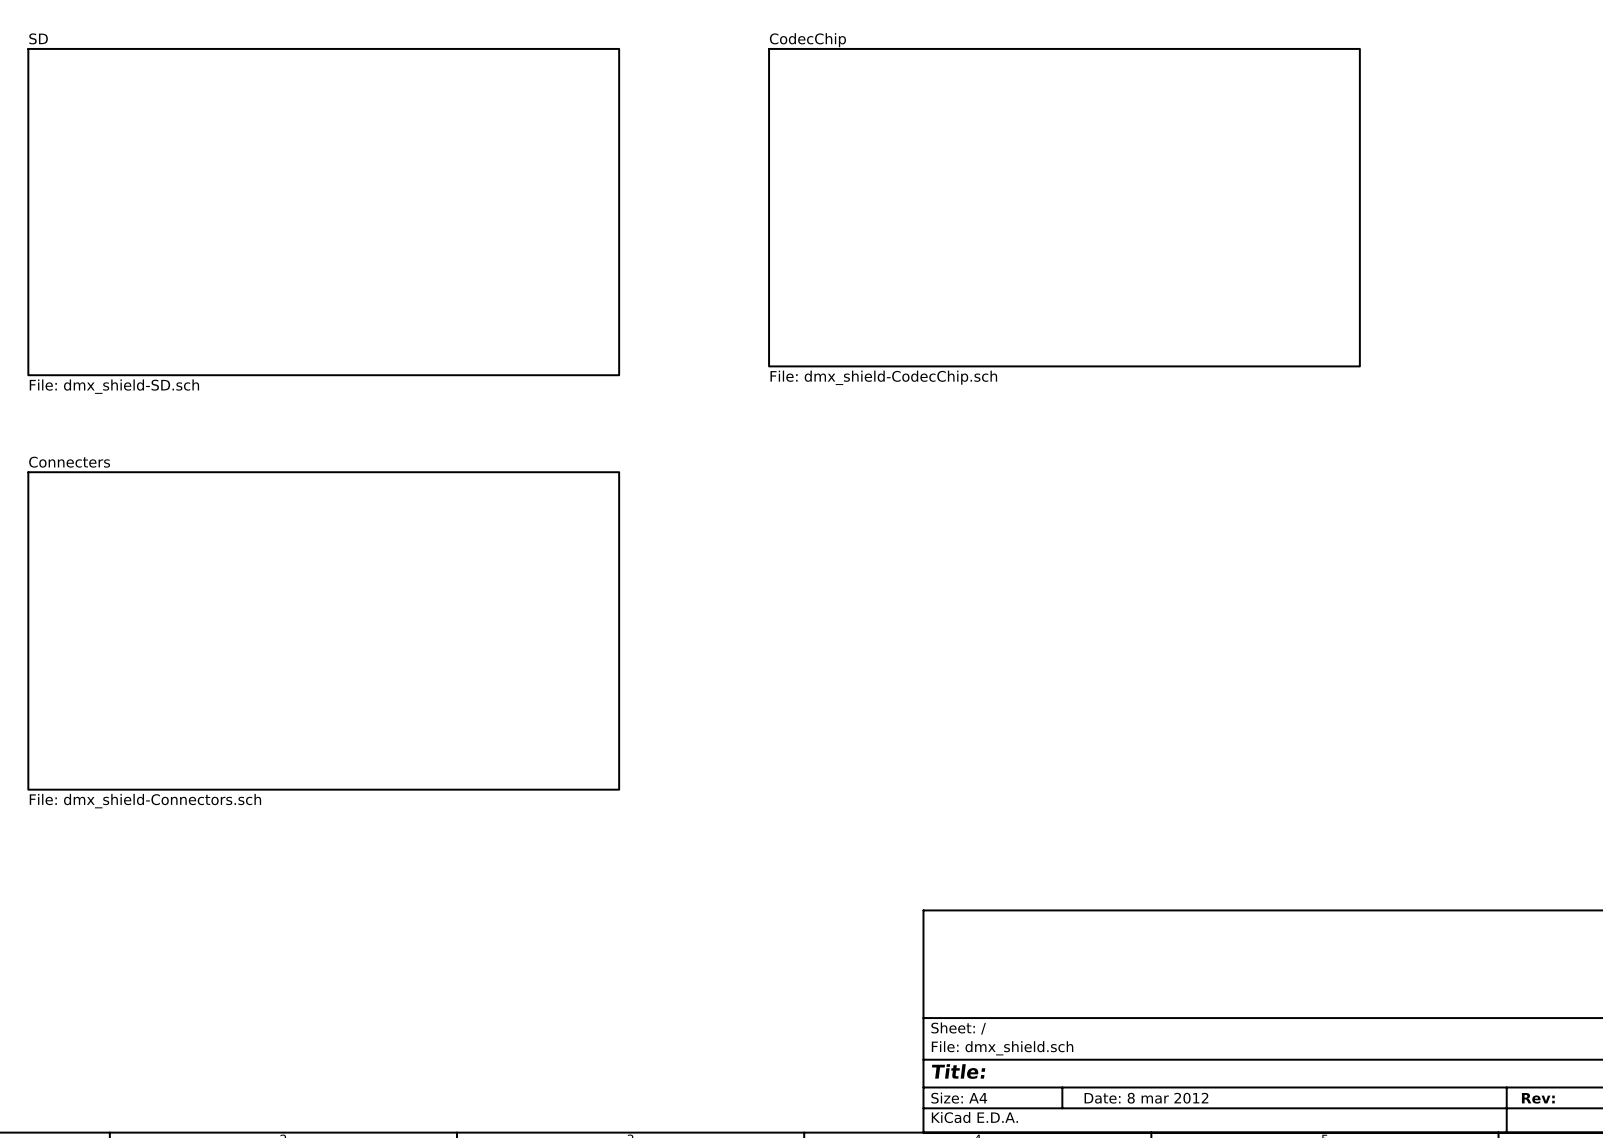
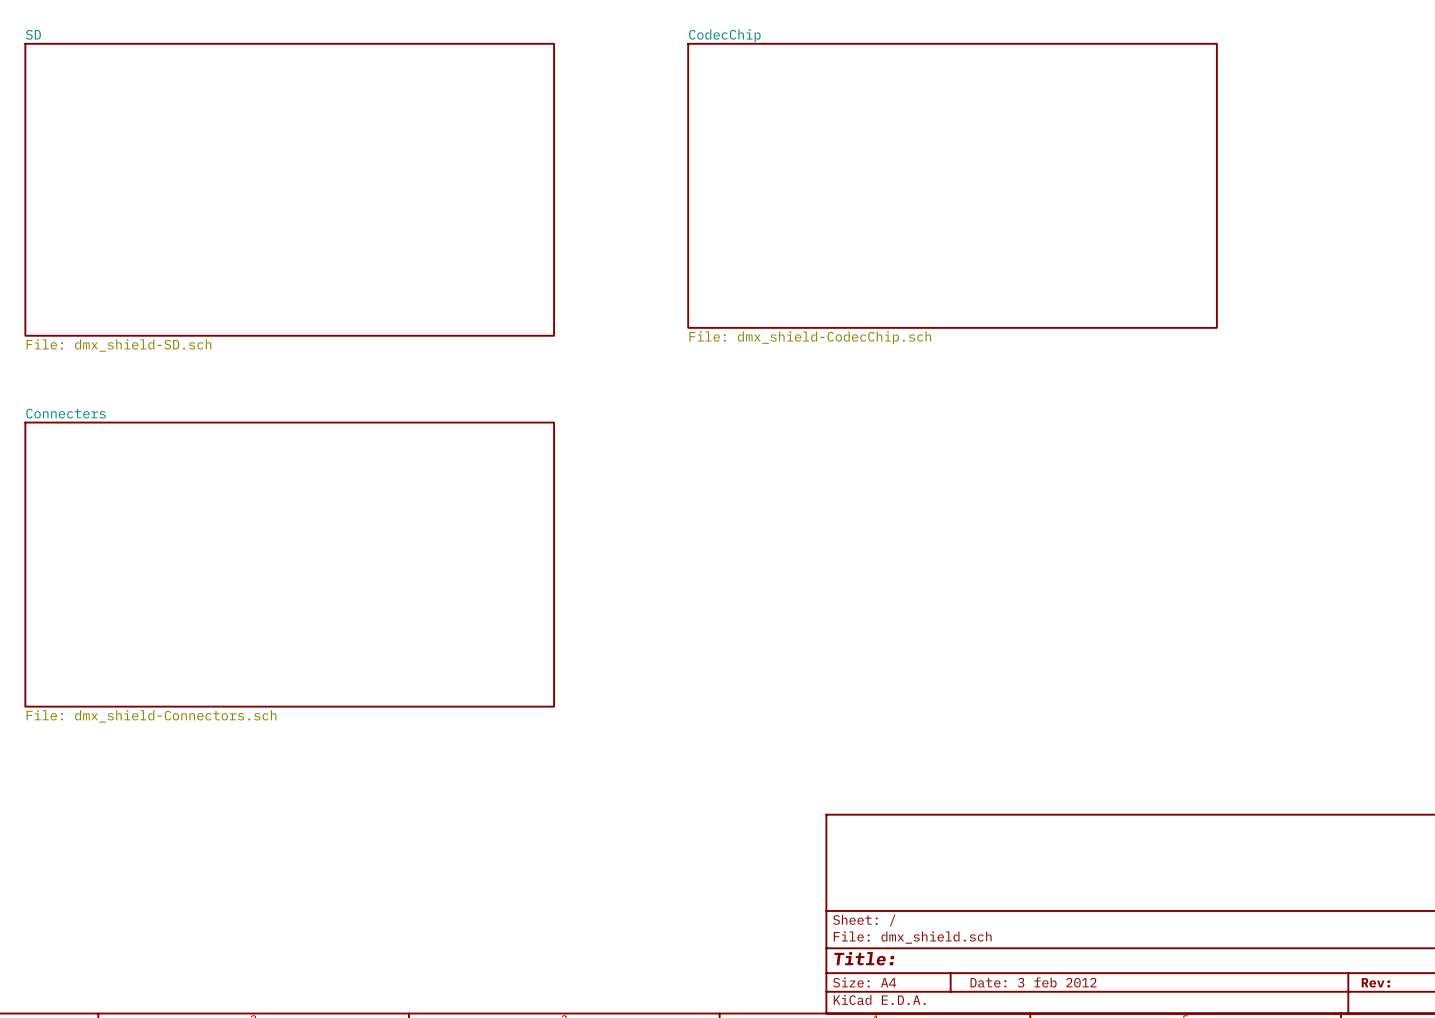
title block: Date: 8 mar 2012 (1146, 1098) -> Date: 3 feb 2012 (1033, 982)

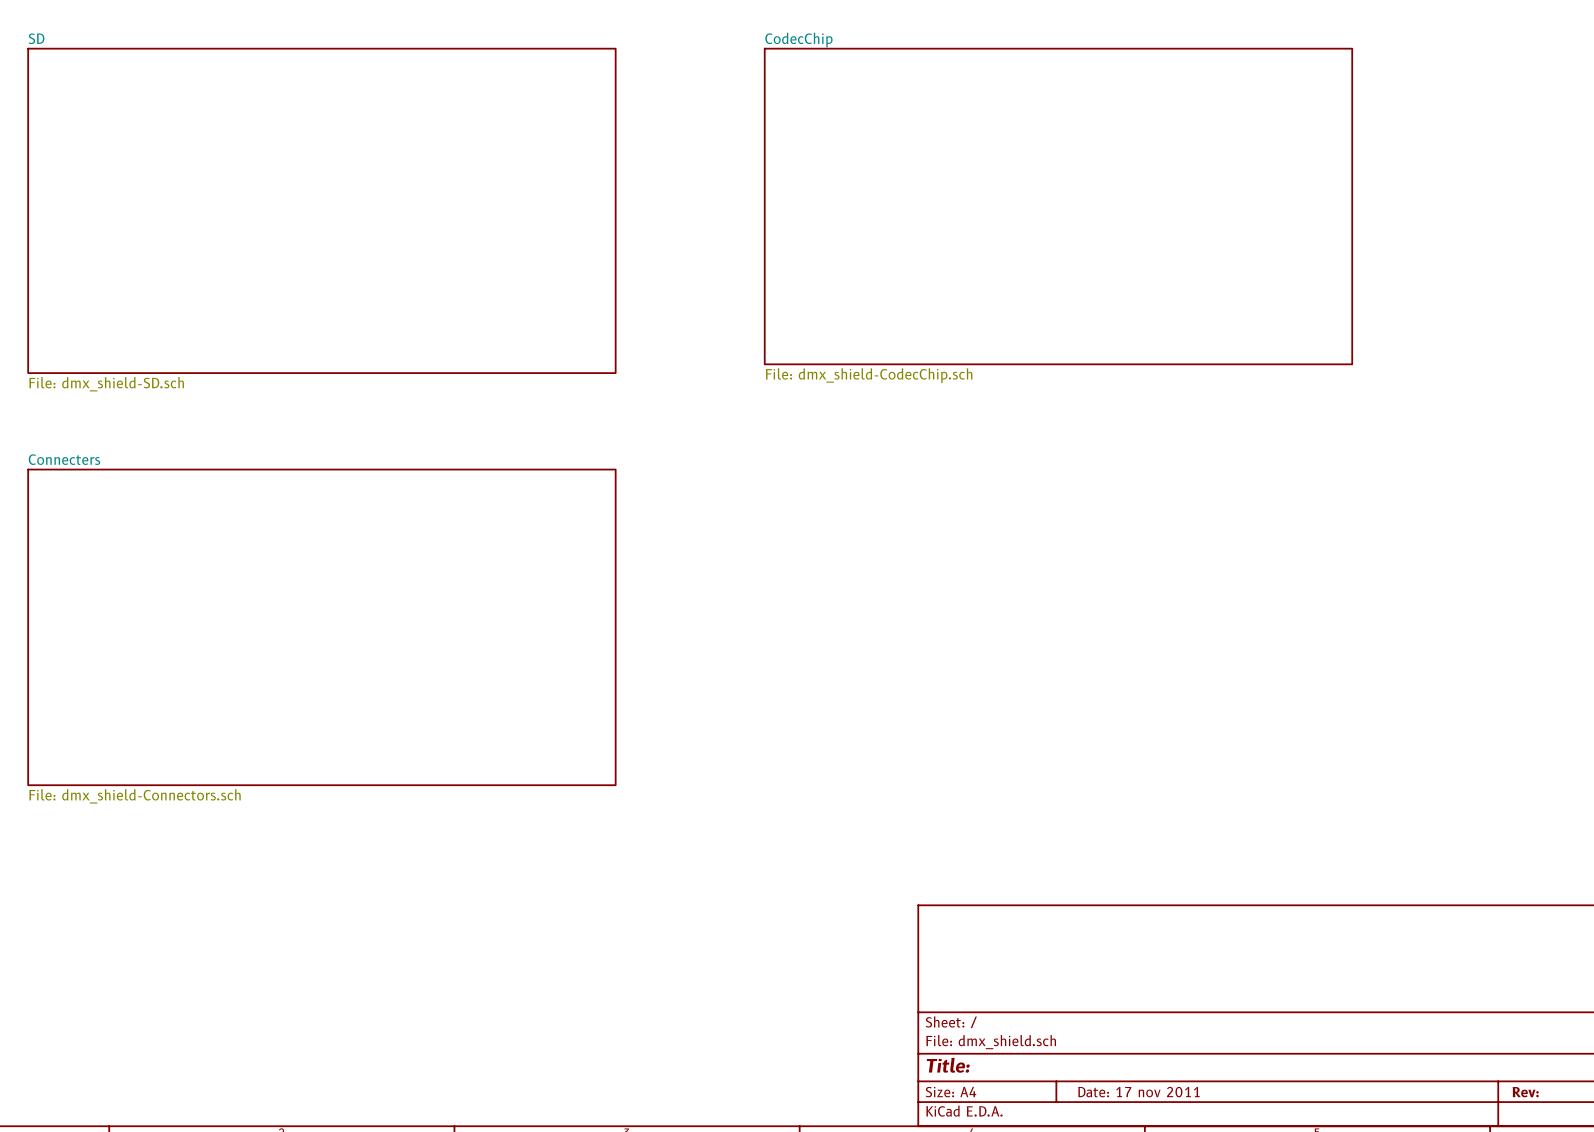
title block: Date: 3 feb 2012 (1033, 982) -> Date: 17 nov 2011 (1138, 1092)

